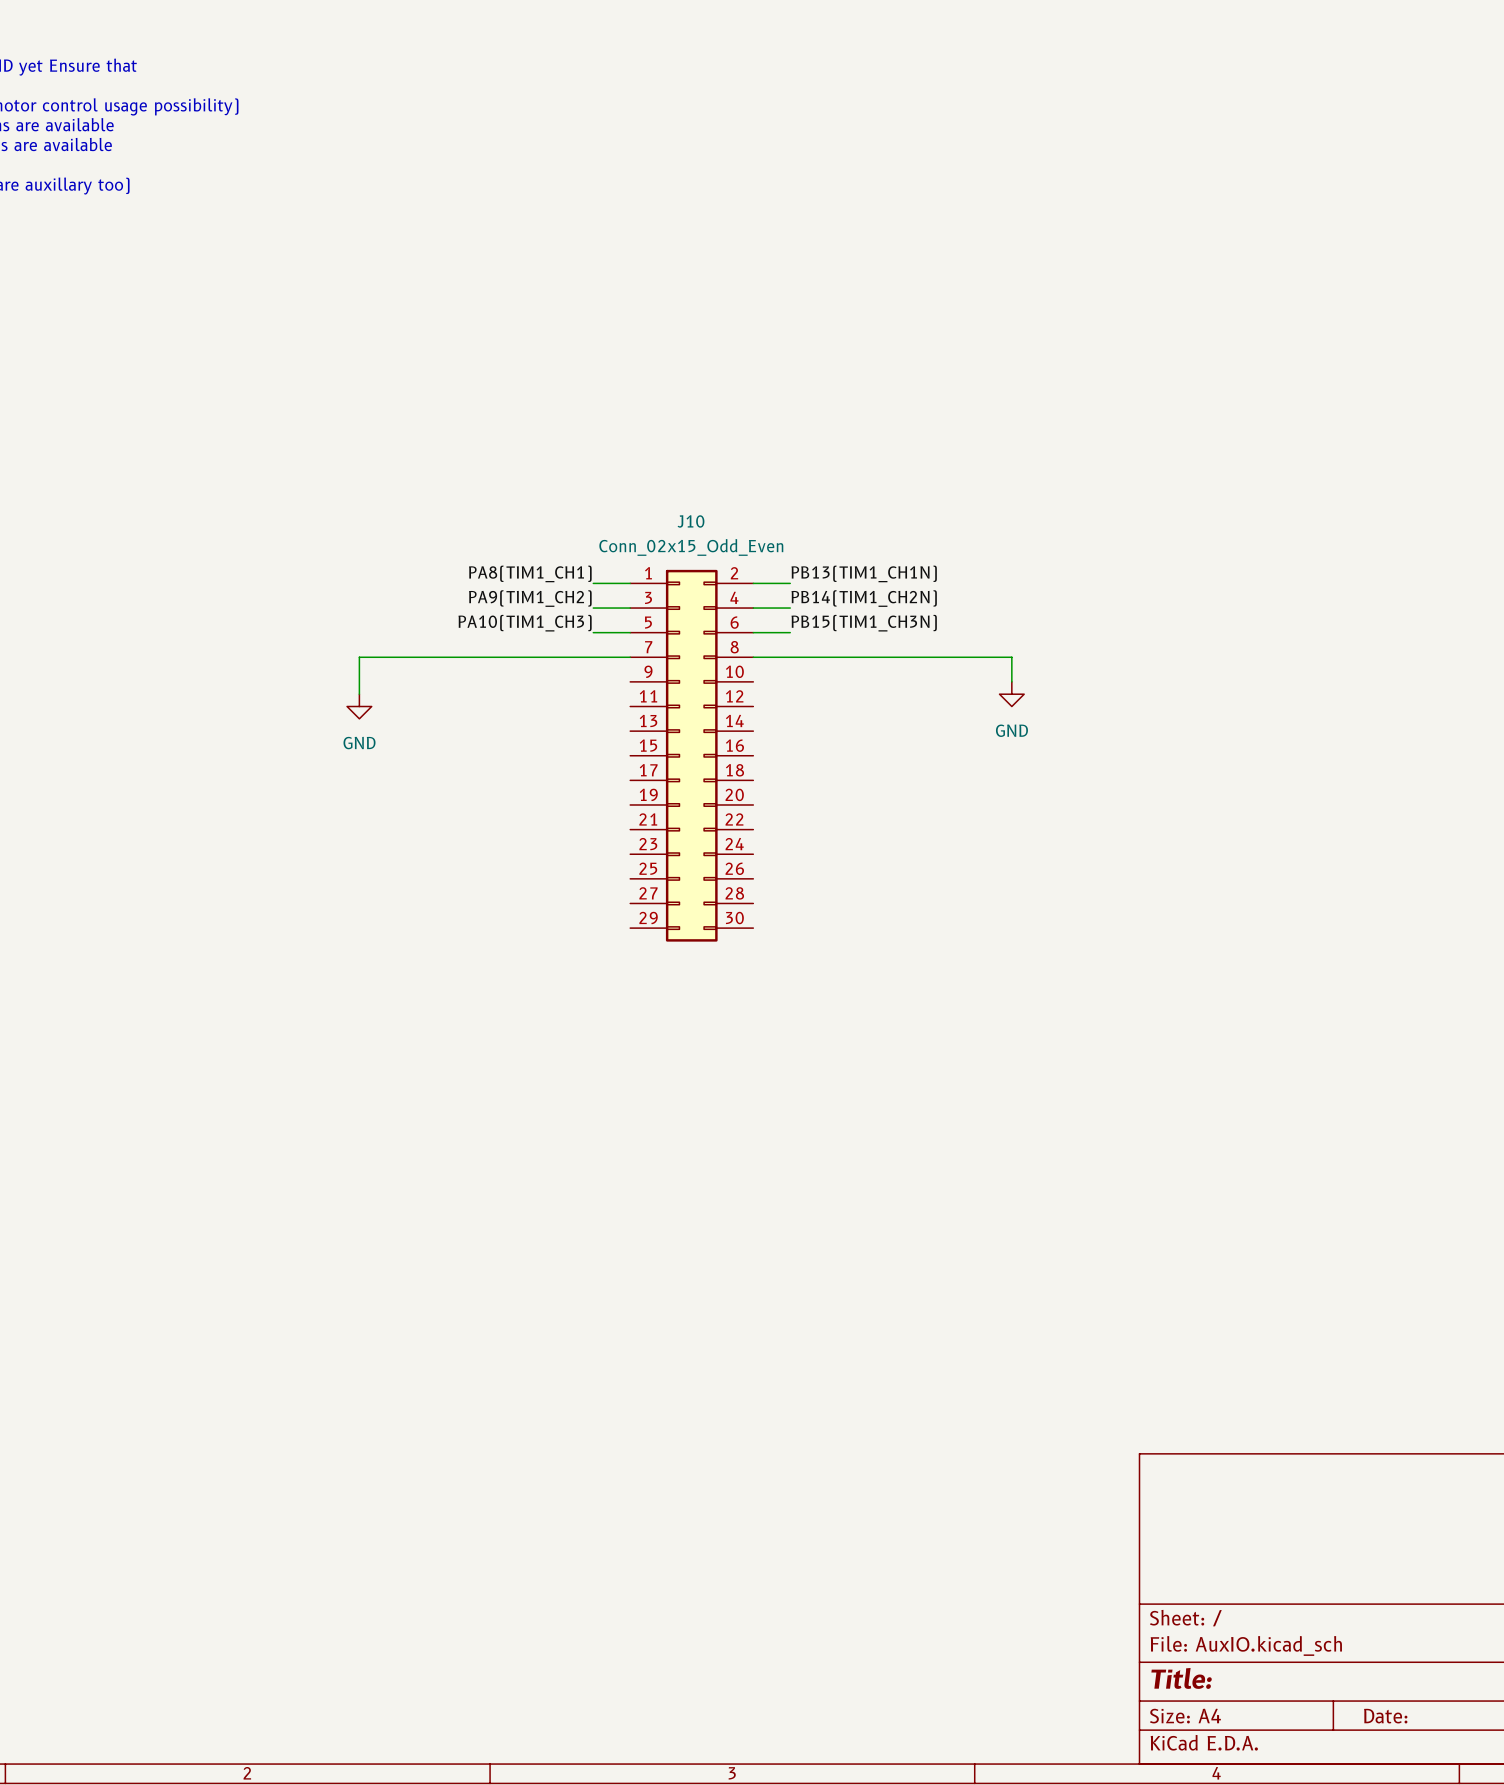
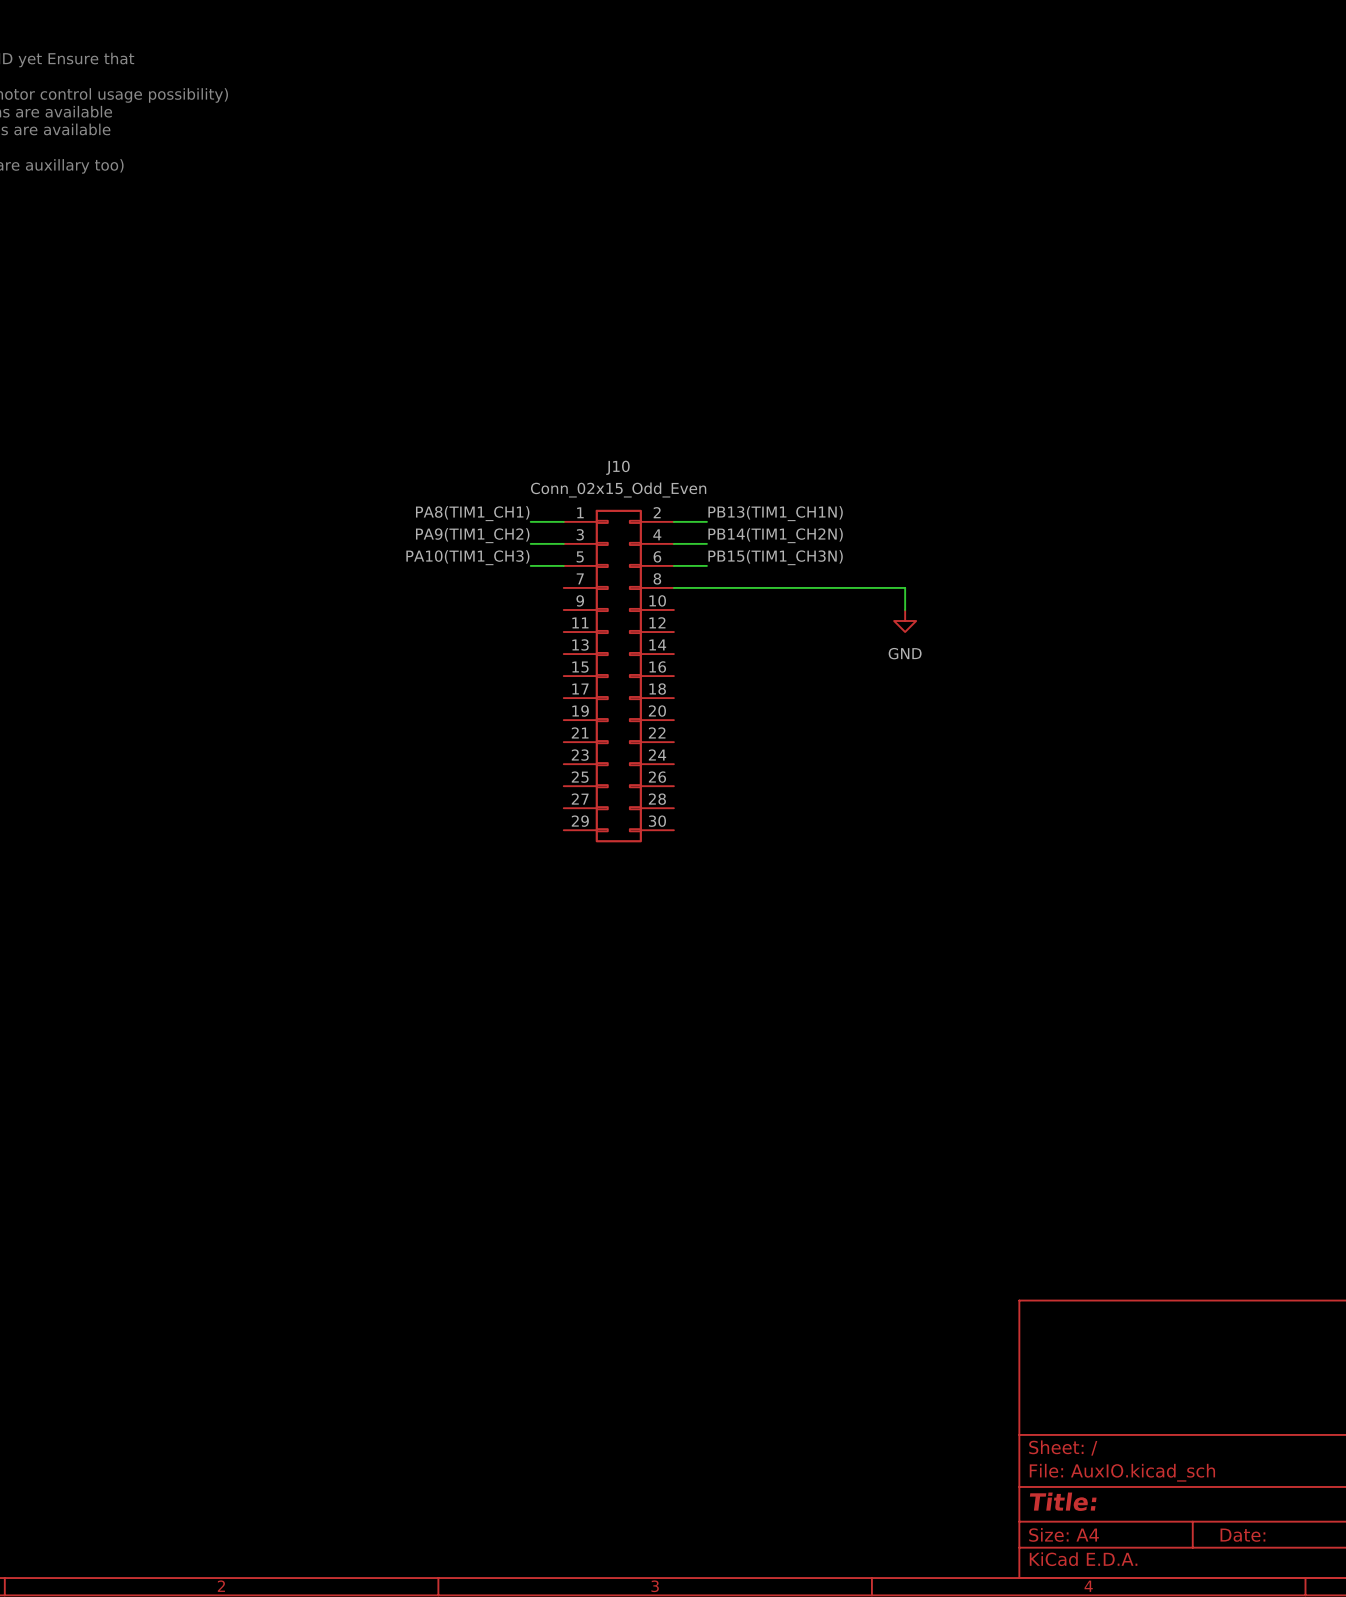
wire: (630, 657) (359, 657) (359, 694) -> none
power symbol: GND (359, 706) -> none

